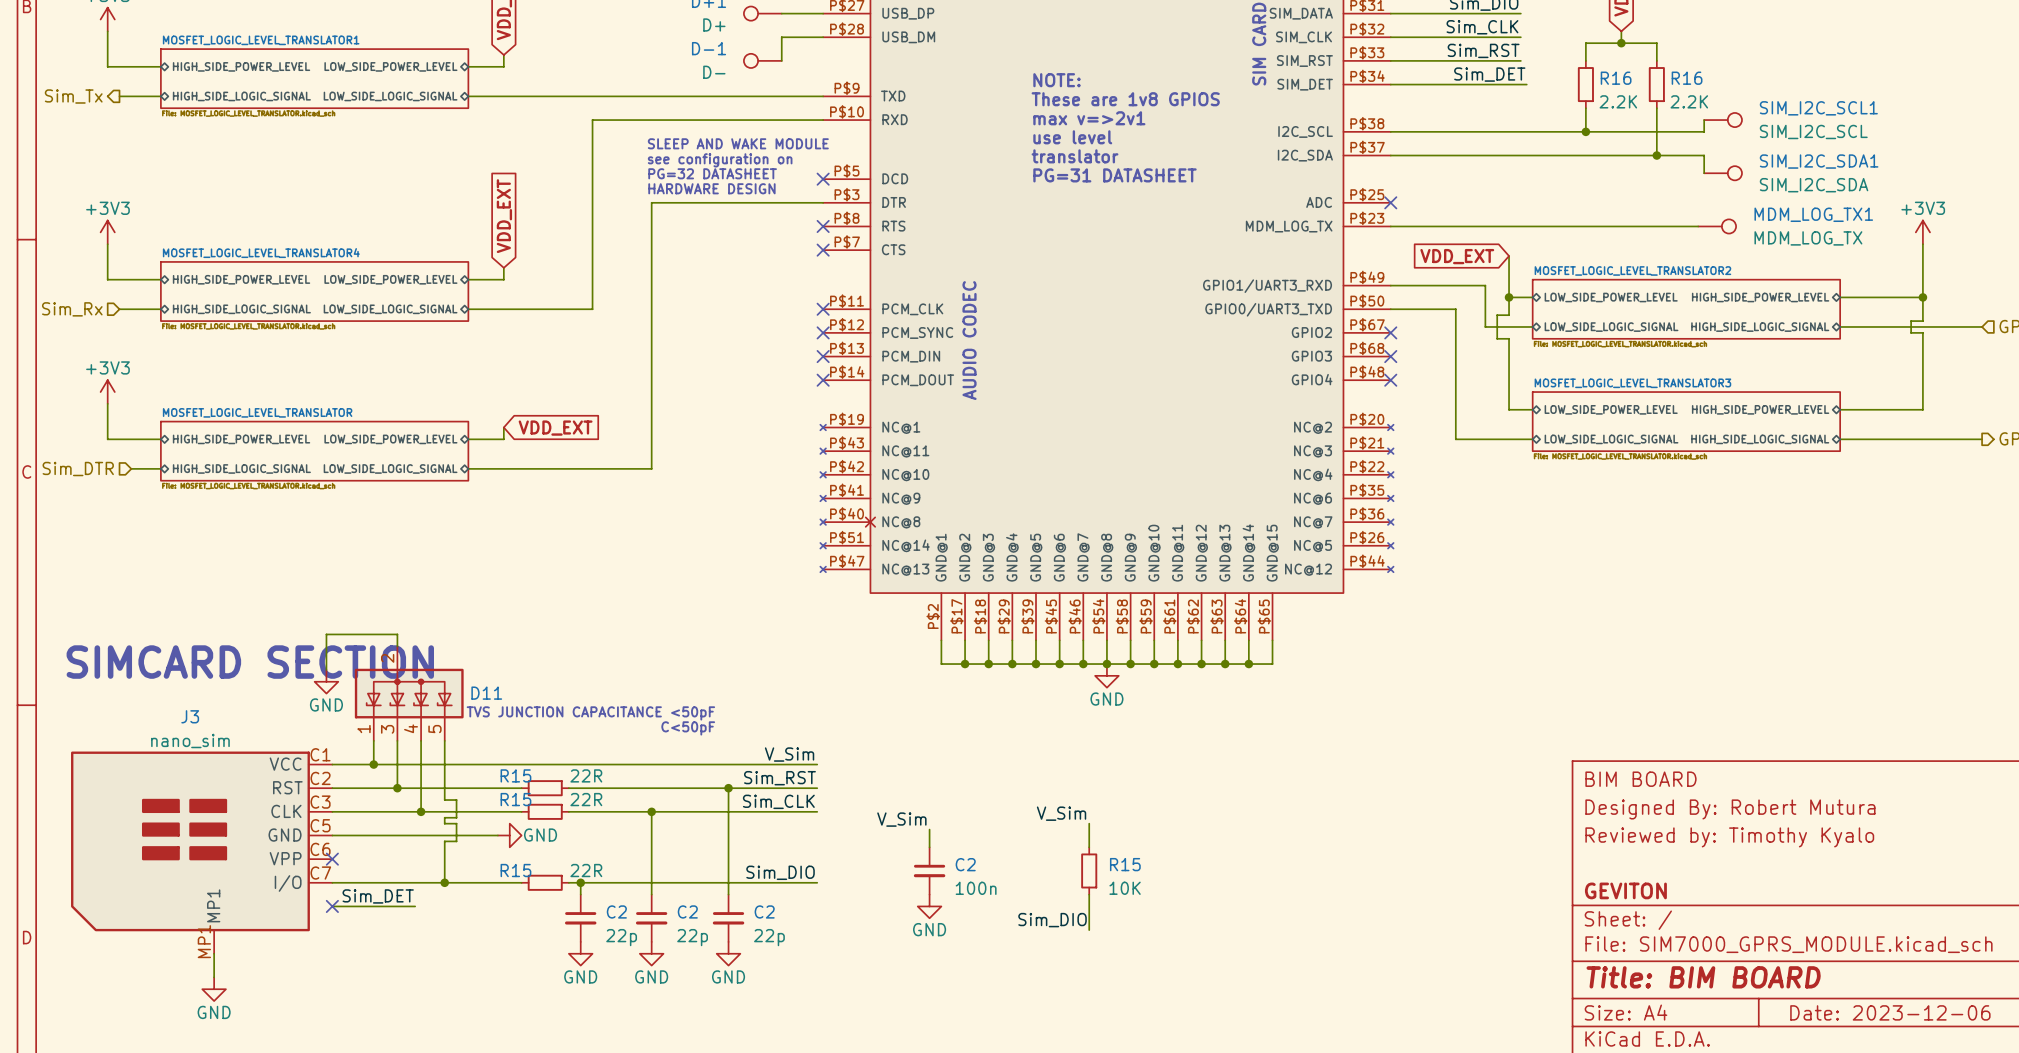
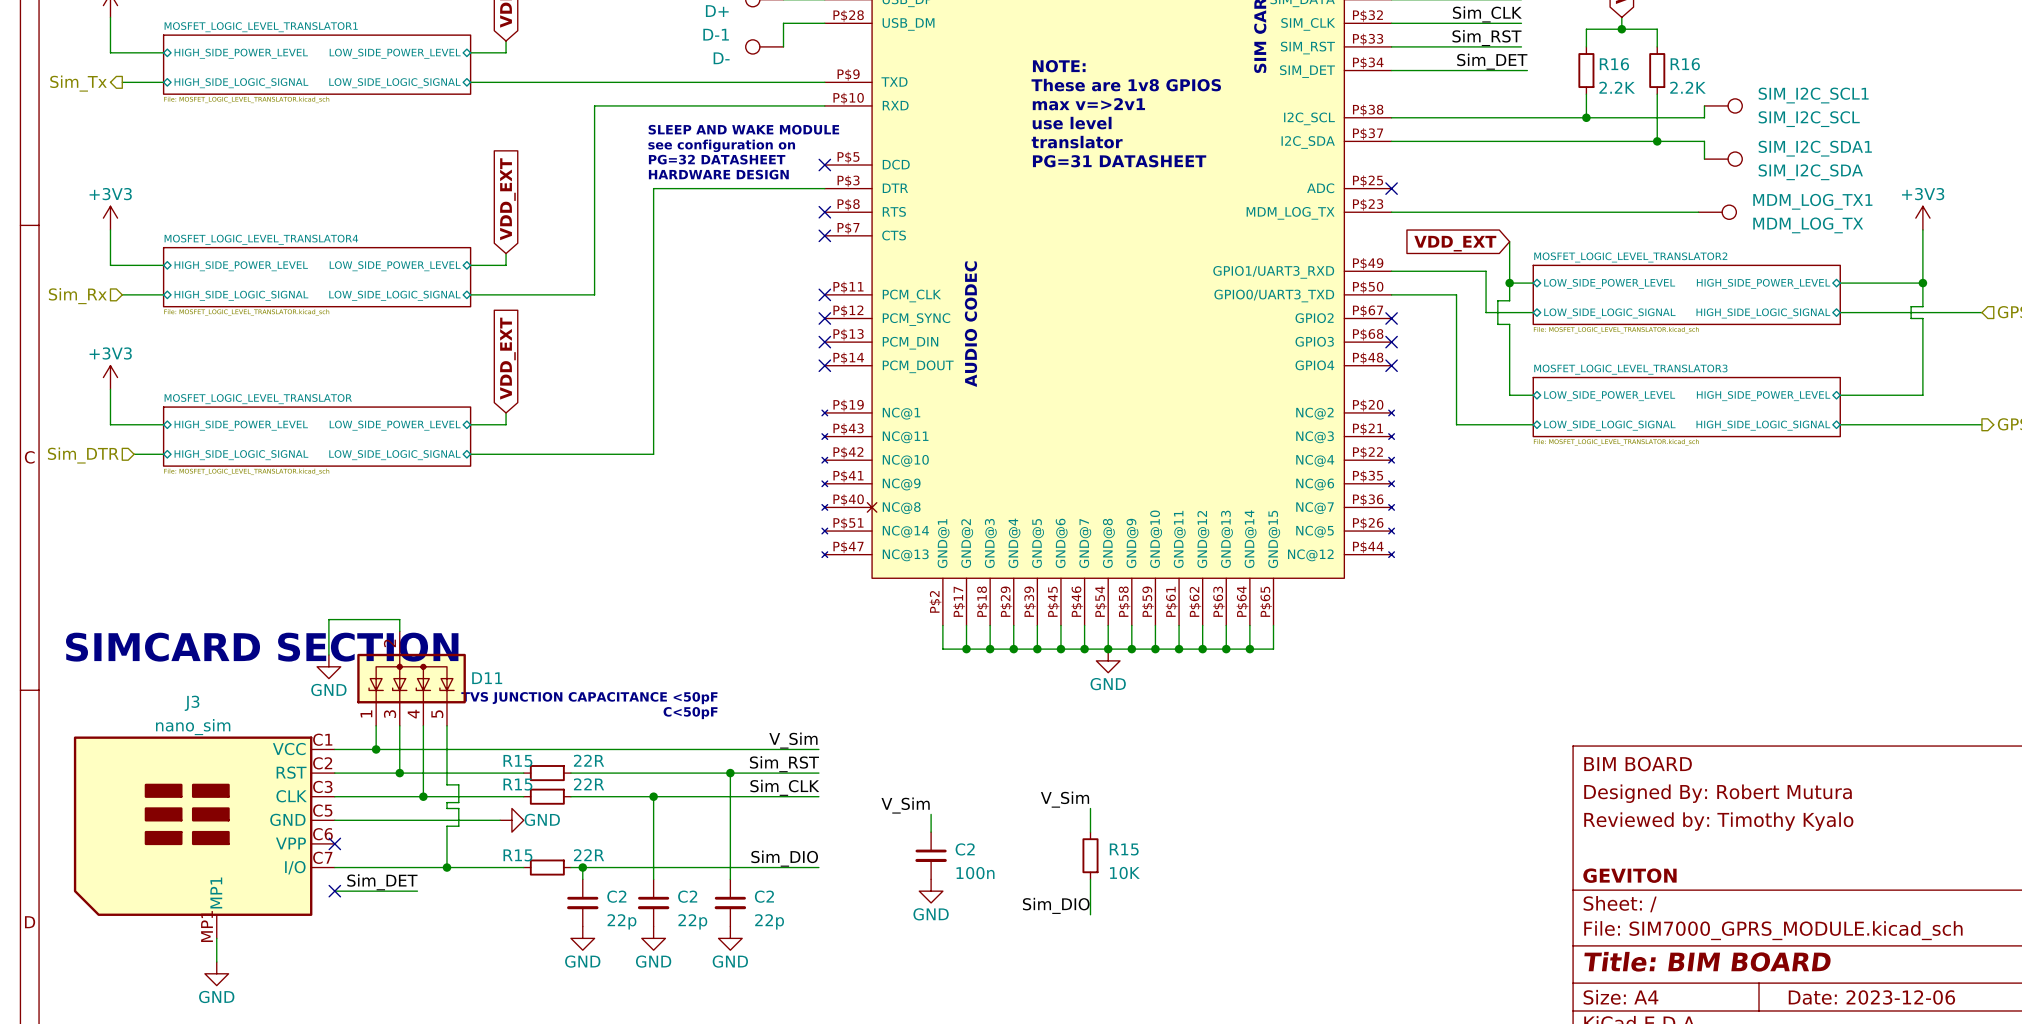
global label rotation: 0° (555, 428) -> 90° counterclockwise (507, 358)

